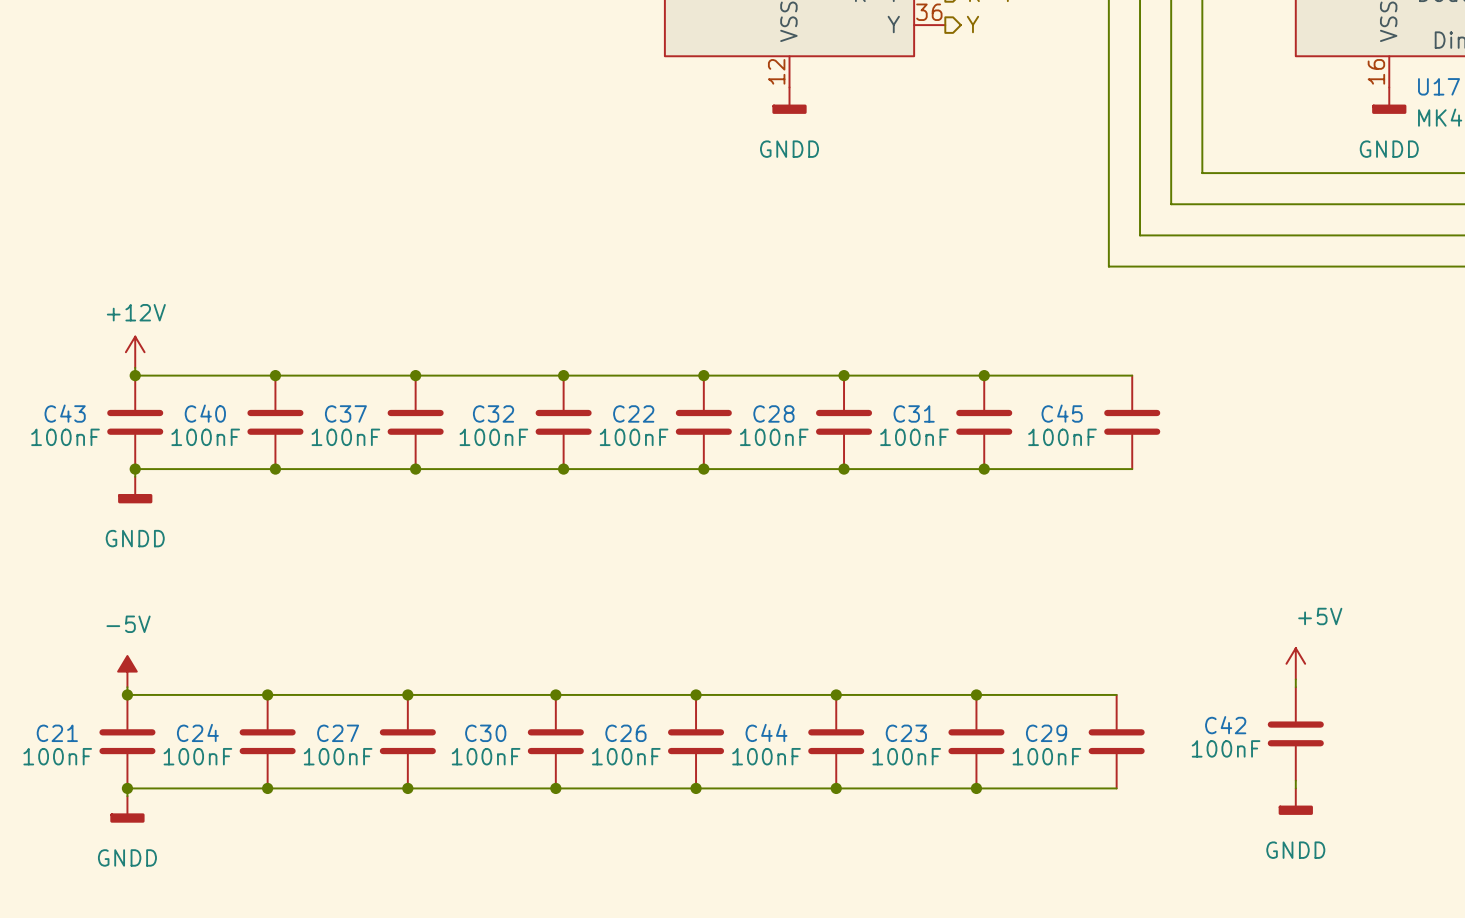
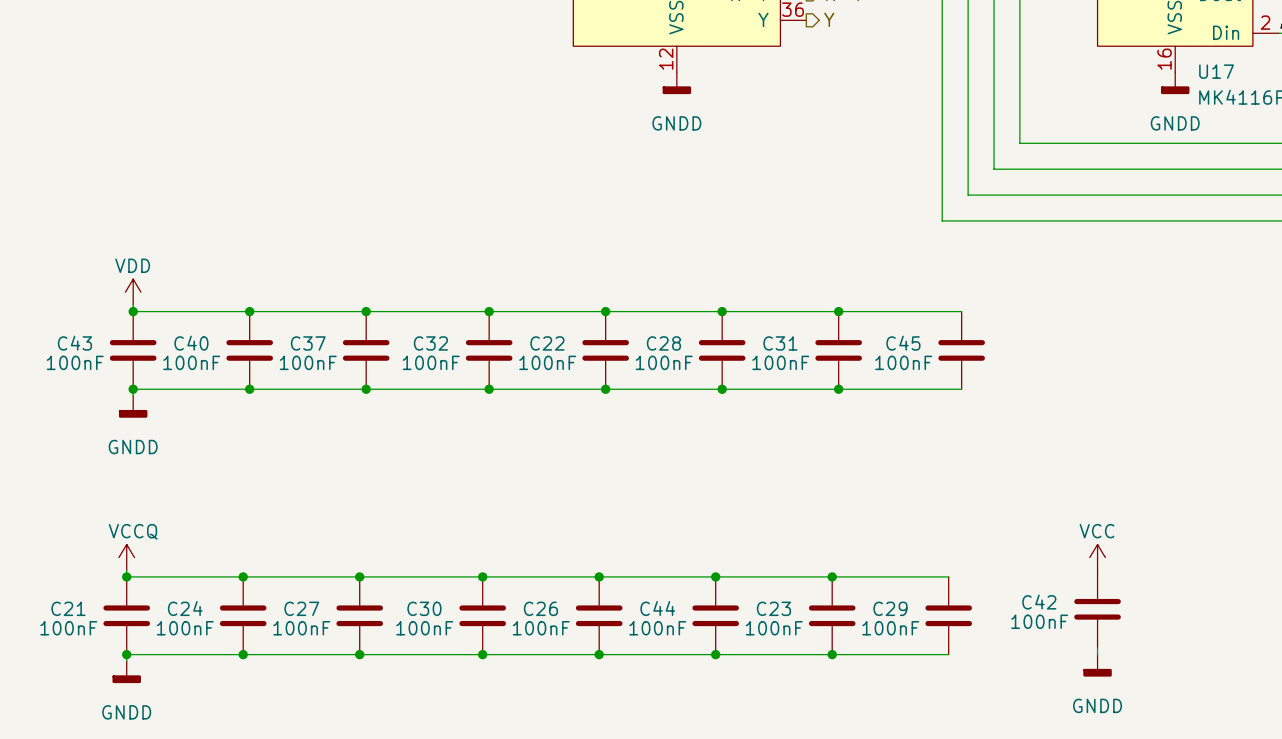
power symbol: +12V (135, 352) -> VDD (133, 292)
power symbol: +5V (1295, 663) -> VCC (1097, 557)
power symbol: -5V (127, 671) -> VCCQ (126, 557)

